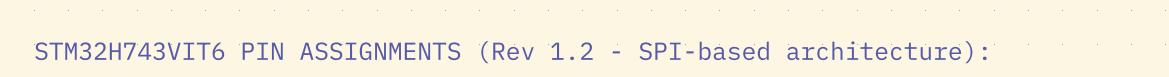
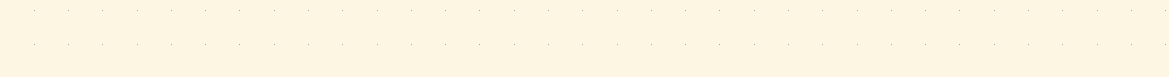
text: STM32H743VIT6 PIN ASSIGNMENTS (Rev 1.2 - SPI-based architecture): (510, 52) -> none

